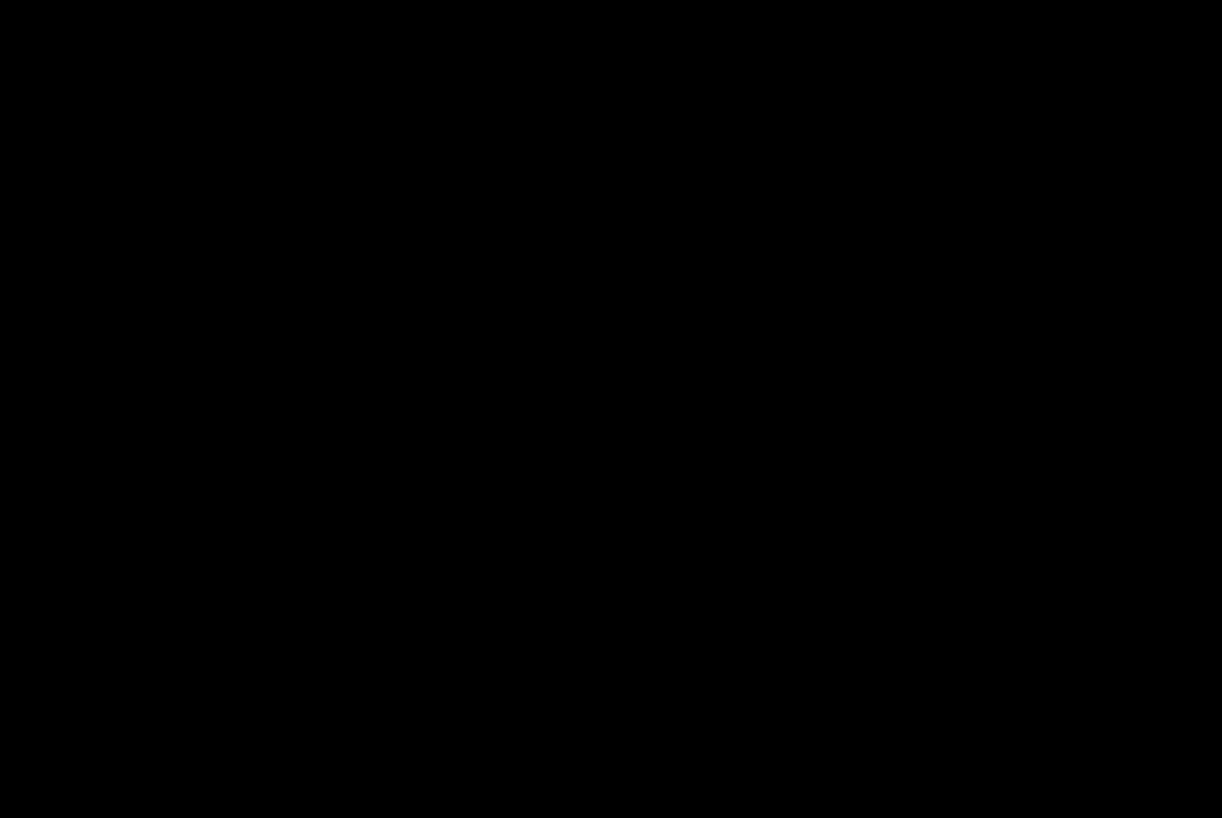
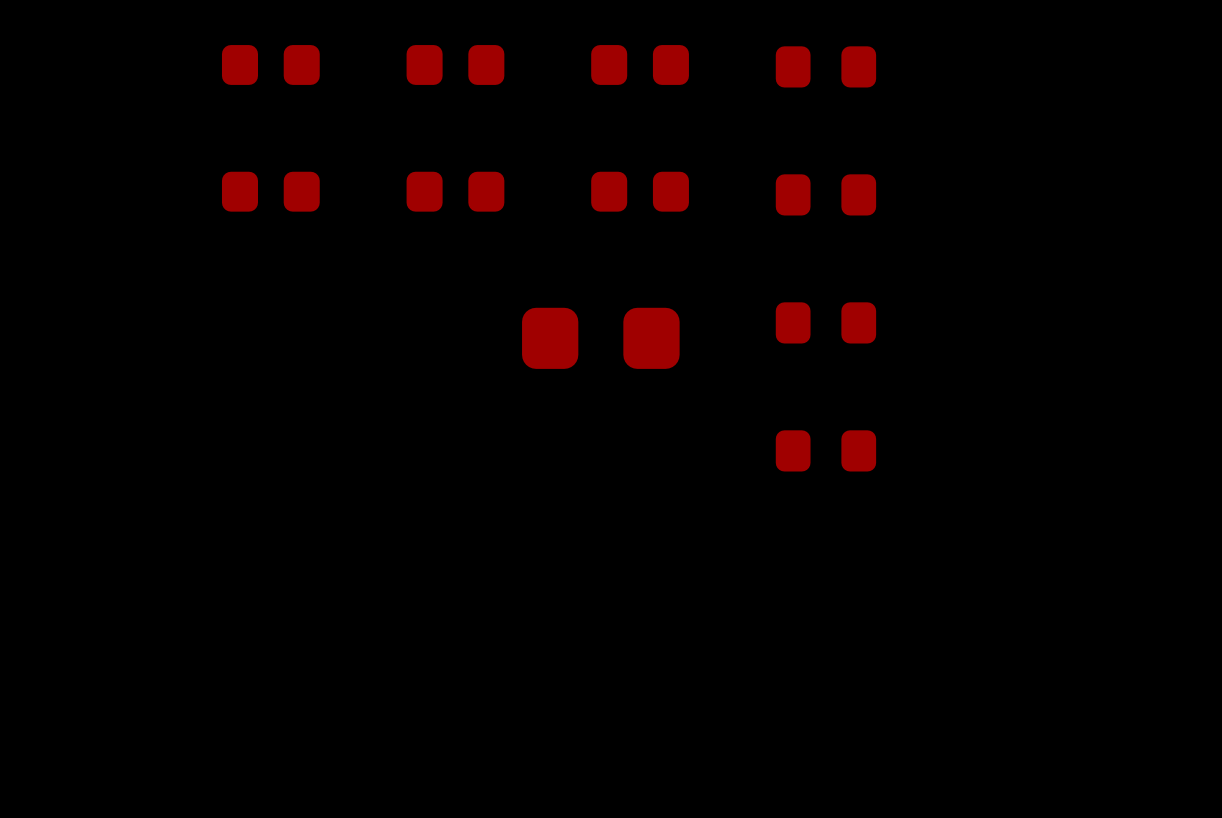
part: none -> (270, 64)
part: none -> (455, 64)
part: none -> (640, 64)
part: none -> (825, 66)
part: none -> (270, 191)
part: none -> (455, 191)
part: none -> (640, 191)
part: none -> (825, 194)
part: none -> (825, 322)
part: none -> (600, 338)
part: none -> (825, 450)

